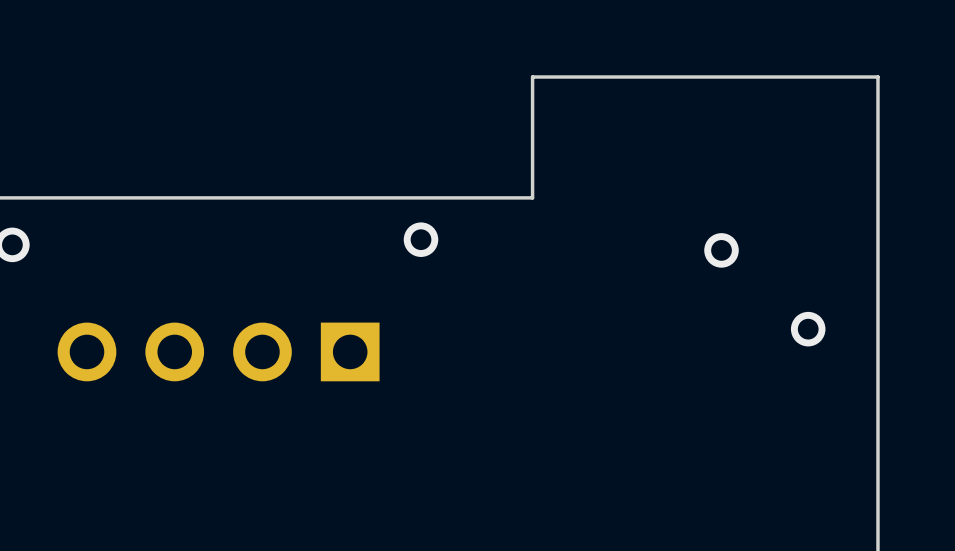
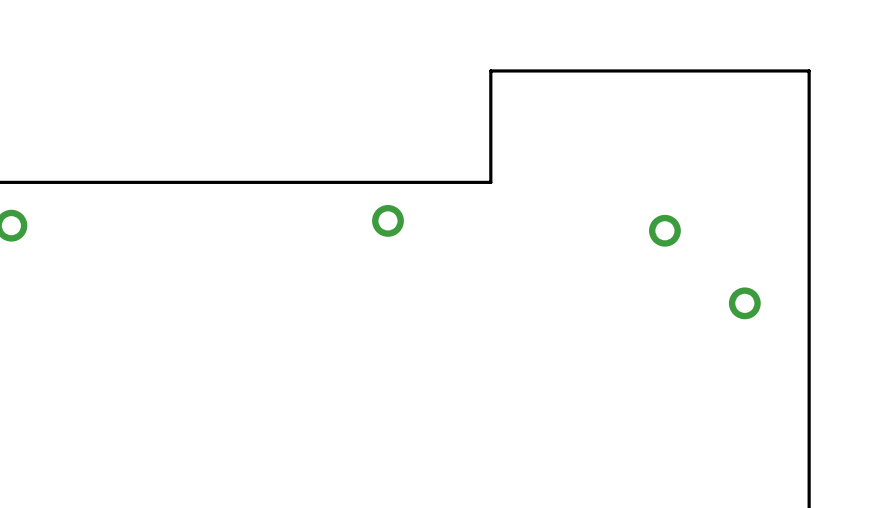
part: (218, 351) -> none

